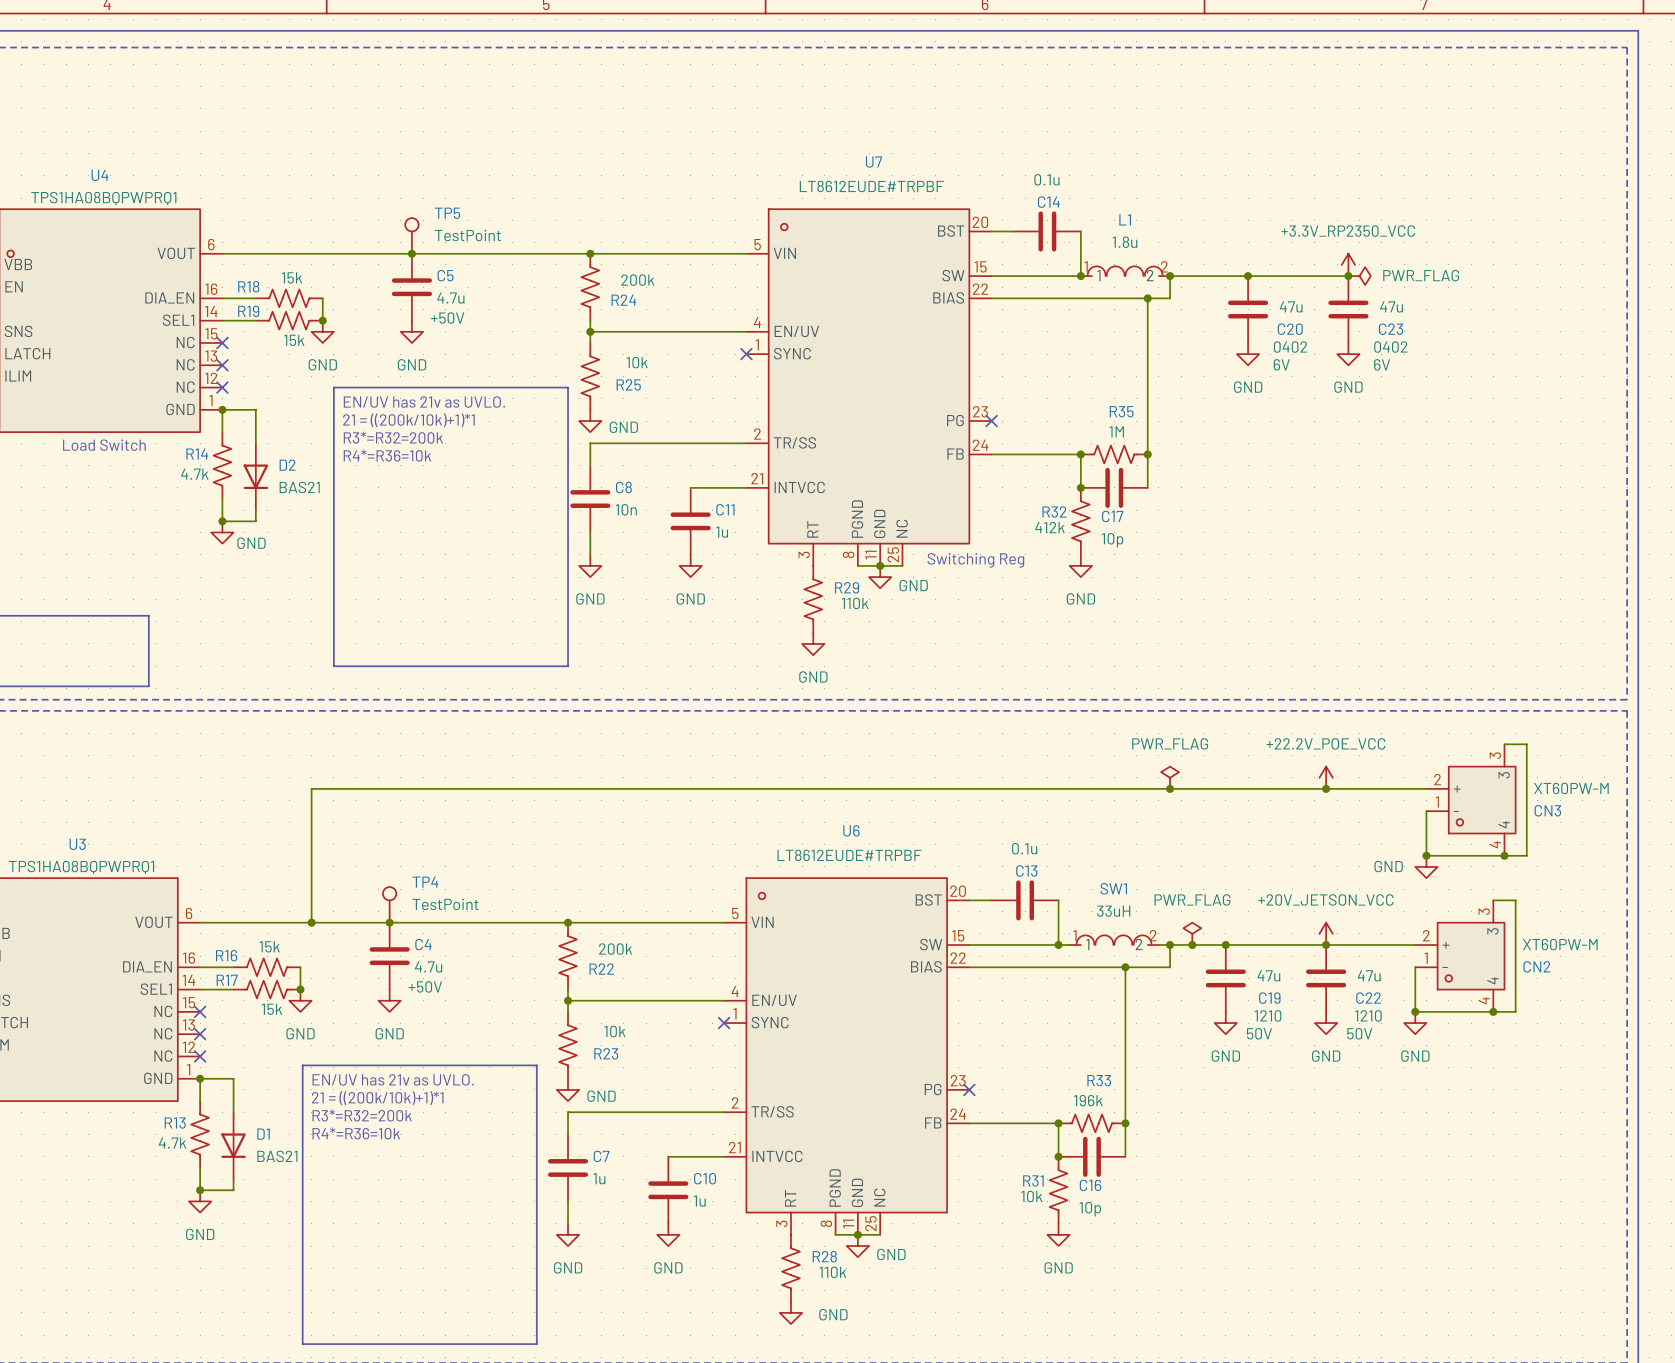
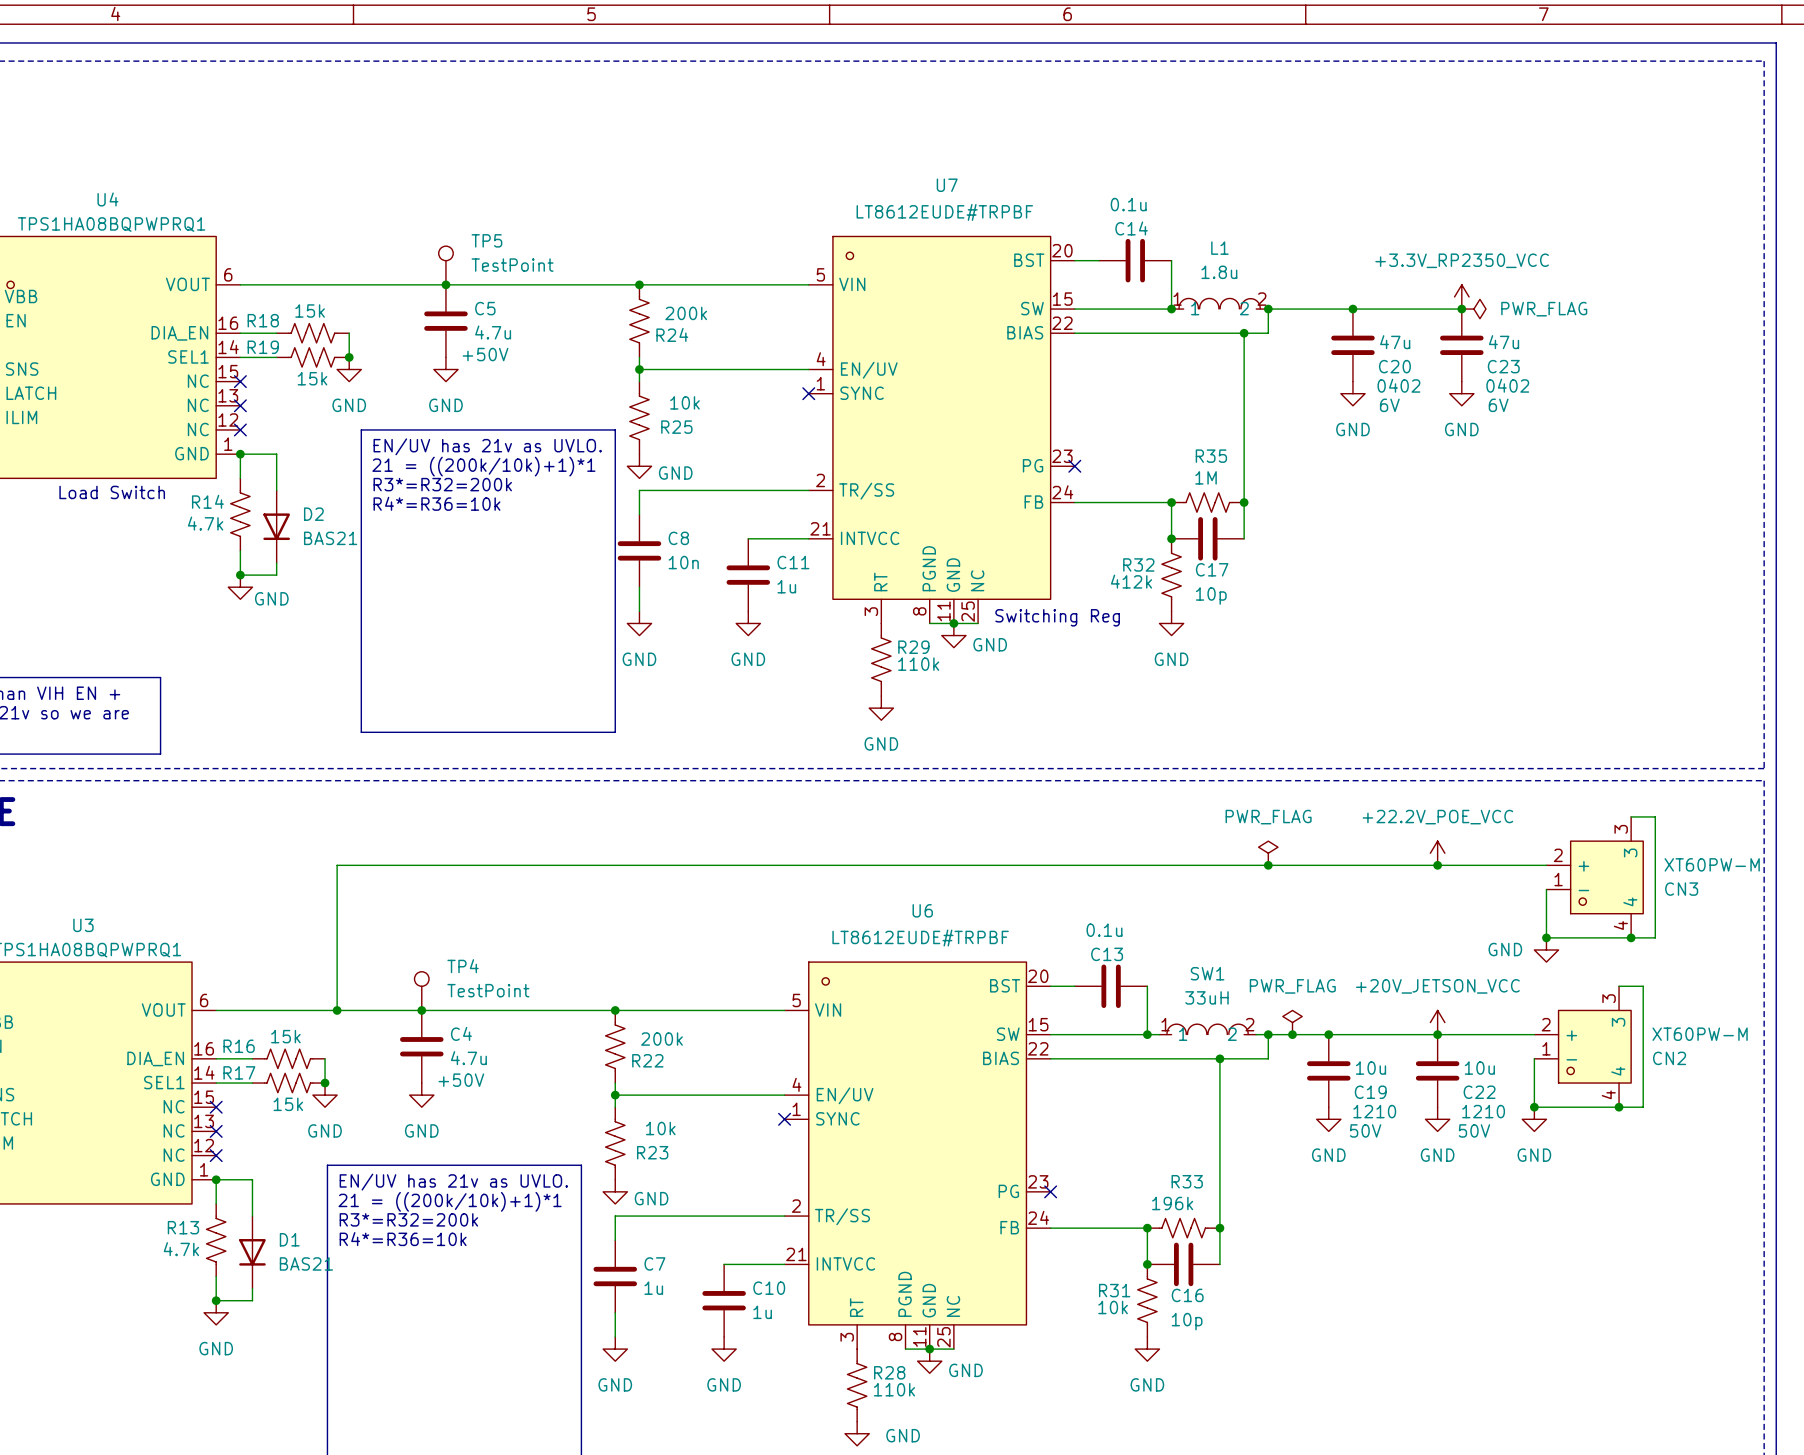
C19 value: 47u (1268, 975) -> 10u (1371, 1068)
C22 value: 47u (1369, 975) -> 10u (1479, 1068)

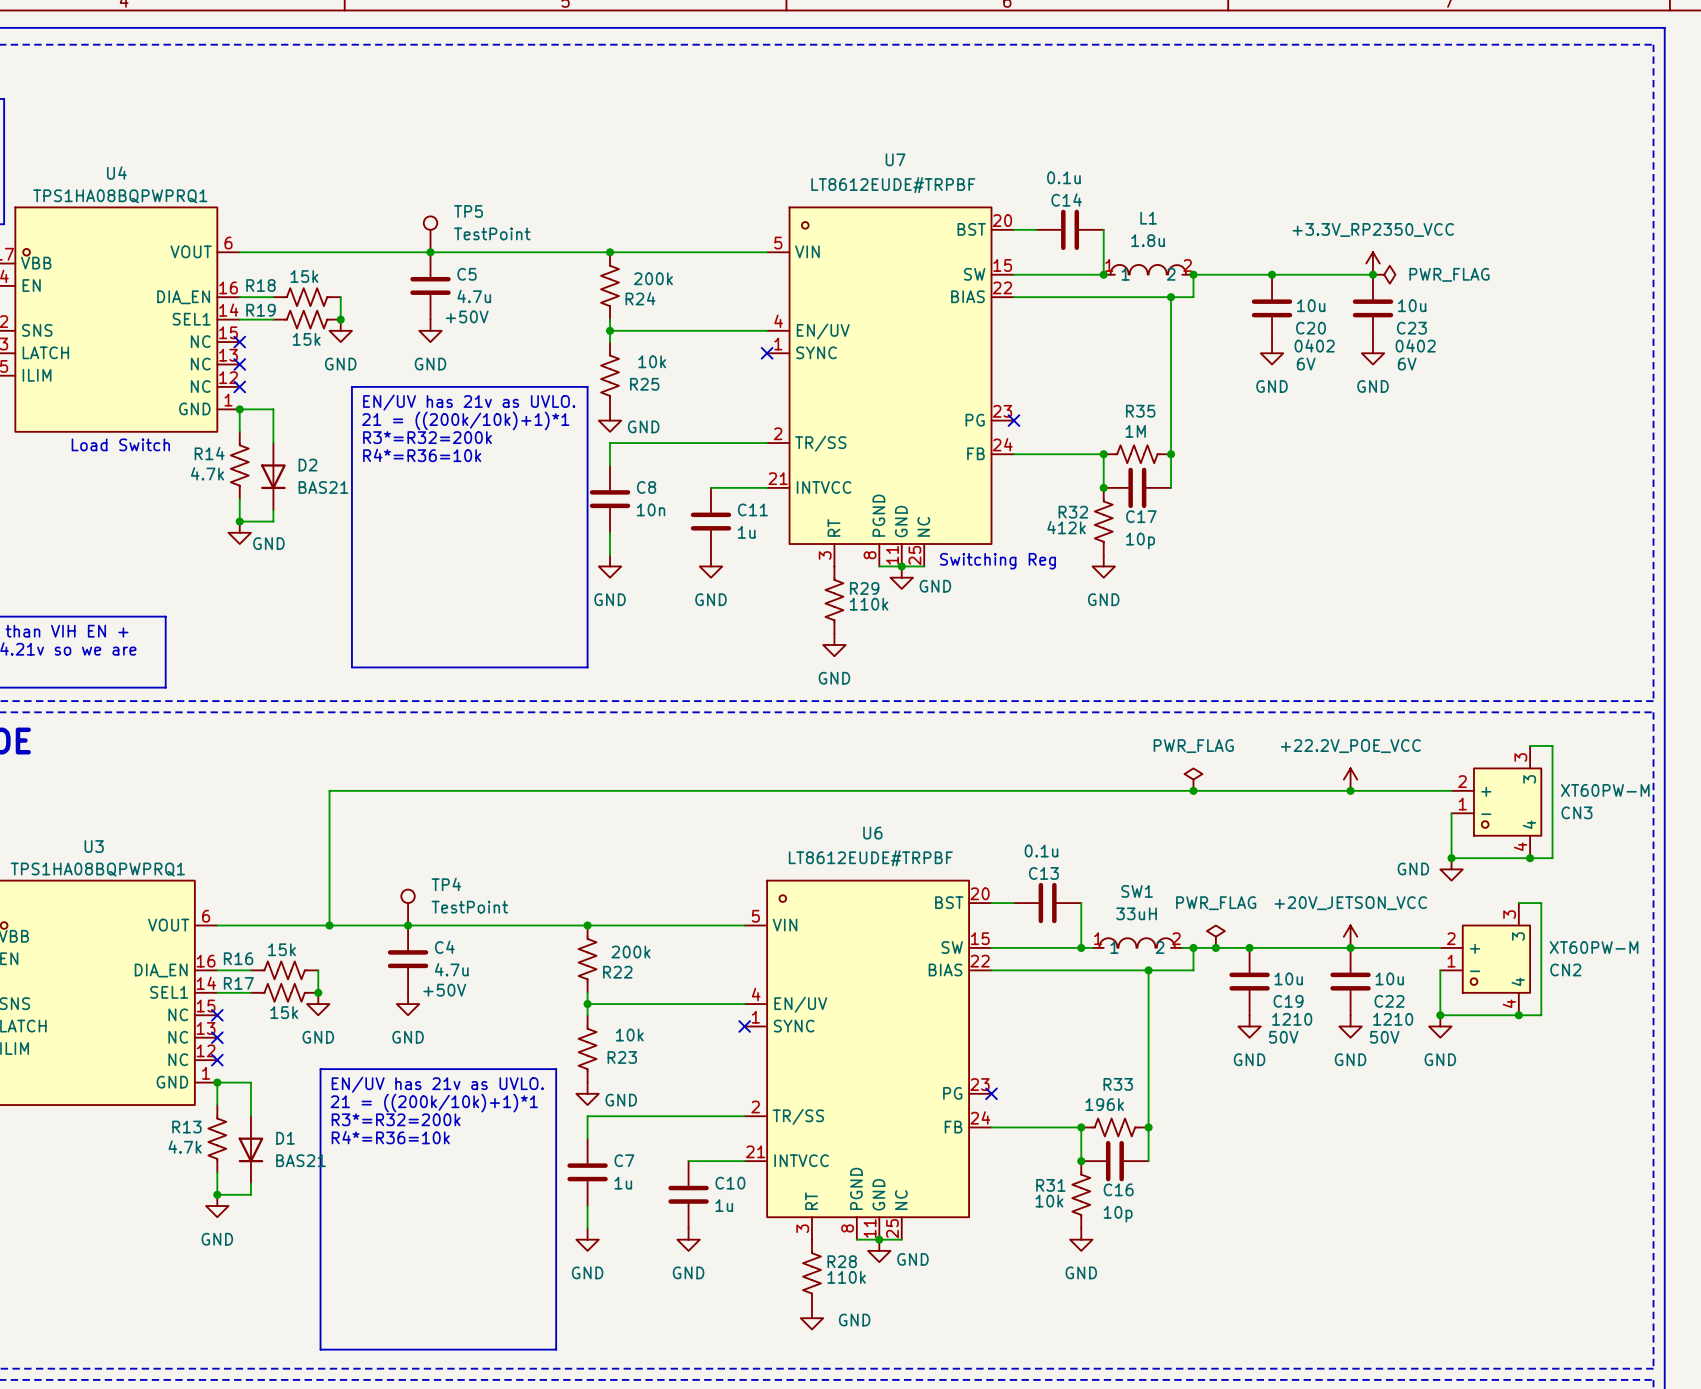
C20 value: 47u (1395, 342) -> 10u (1311, 305)
C23 value: 47u (1504, 342) -> 10u (1412, 305)

